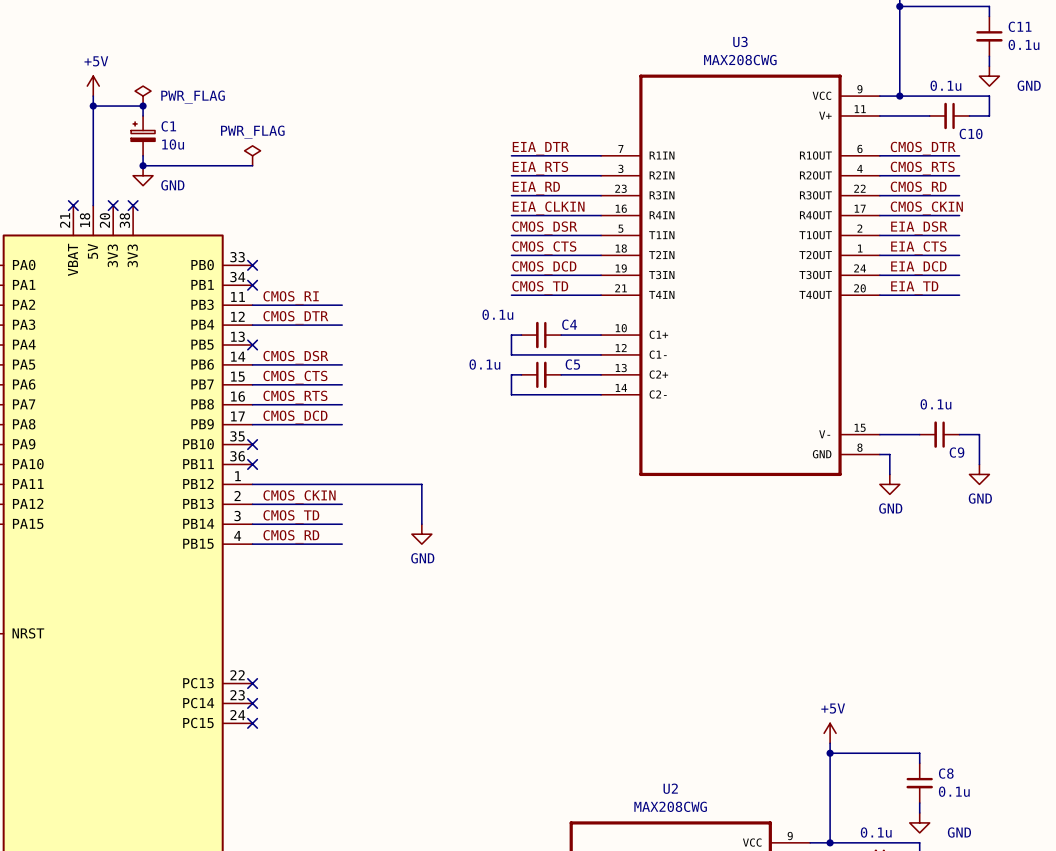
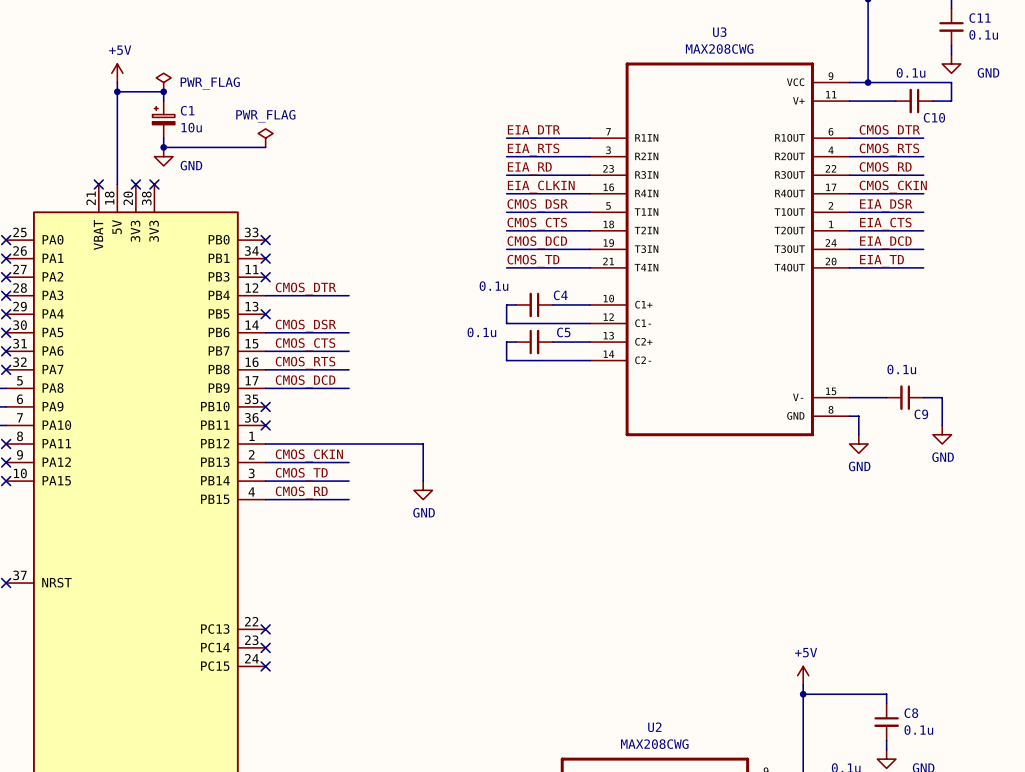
label: CMOS_RI (291, 297) -> none
wire: (252, 305) (342, 305) -> none
no-connect mark: none -> (265, 277)

